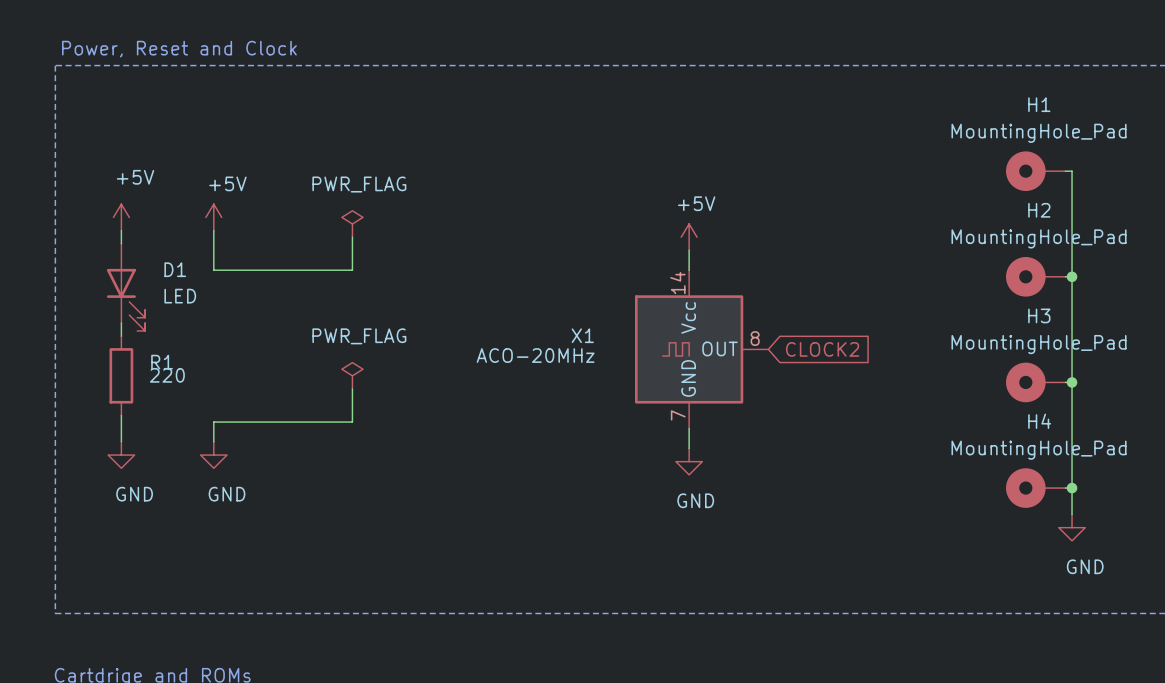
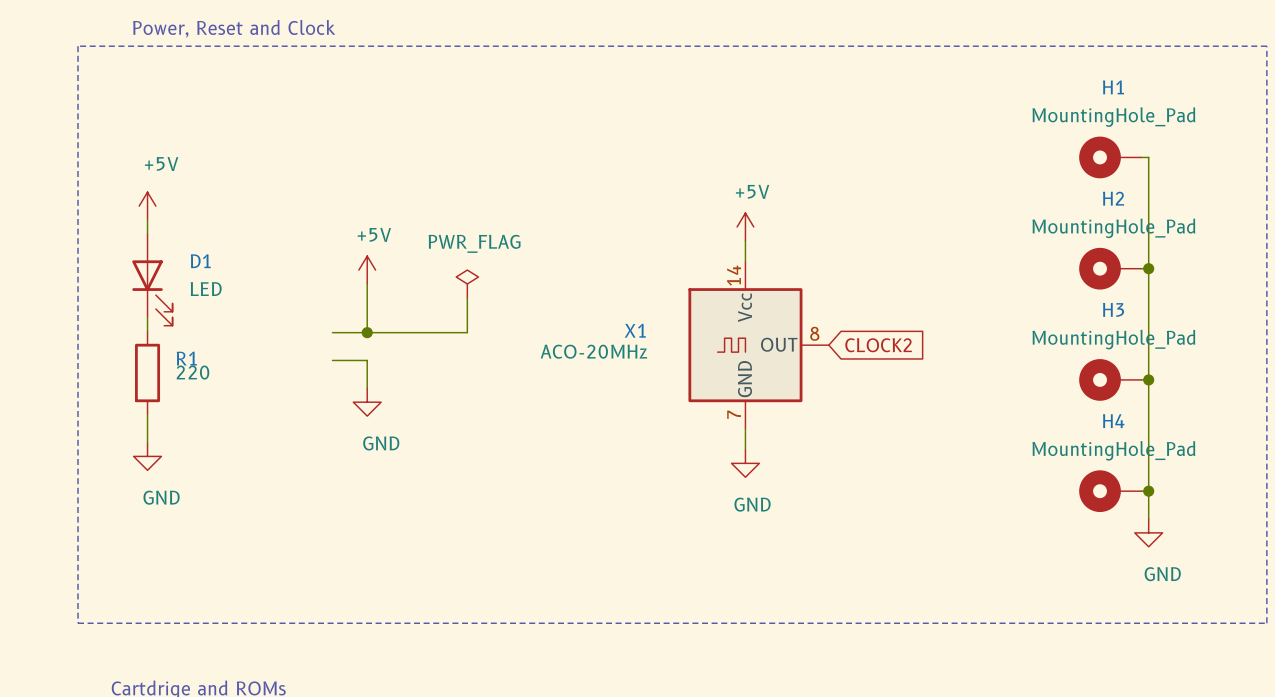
power symbol text position: +5V (227, 183) -> +5V (374, 234)
power symbol position: +5V (213, 217) -> +5V (367, 270)
power symbol: PWR_FLAG (352, 224) -> none
wire: (213, 230) (213, 270) (352, 270) (352, 237) -> none
wire: none -> (367, 283) (367, 332)
power symbol: none -> PWR_FLAG (467, 283)
wire: none -> (467, 297) (467, 332) (332, 332)
junction: none -> (367, 332)
wire: none -> (332, 360) (367, 360) (367, 388)
power symbol: PWR_FLAG (352, 375) -> none
wire: (352, 389) (352, 422) (213, 422) (213, 441) -> none
power symbol position: GND (213, 455) -> GND (367, 402)

